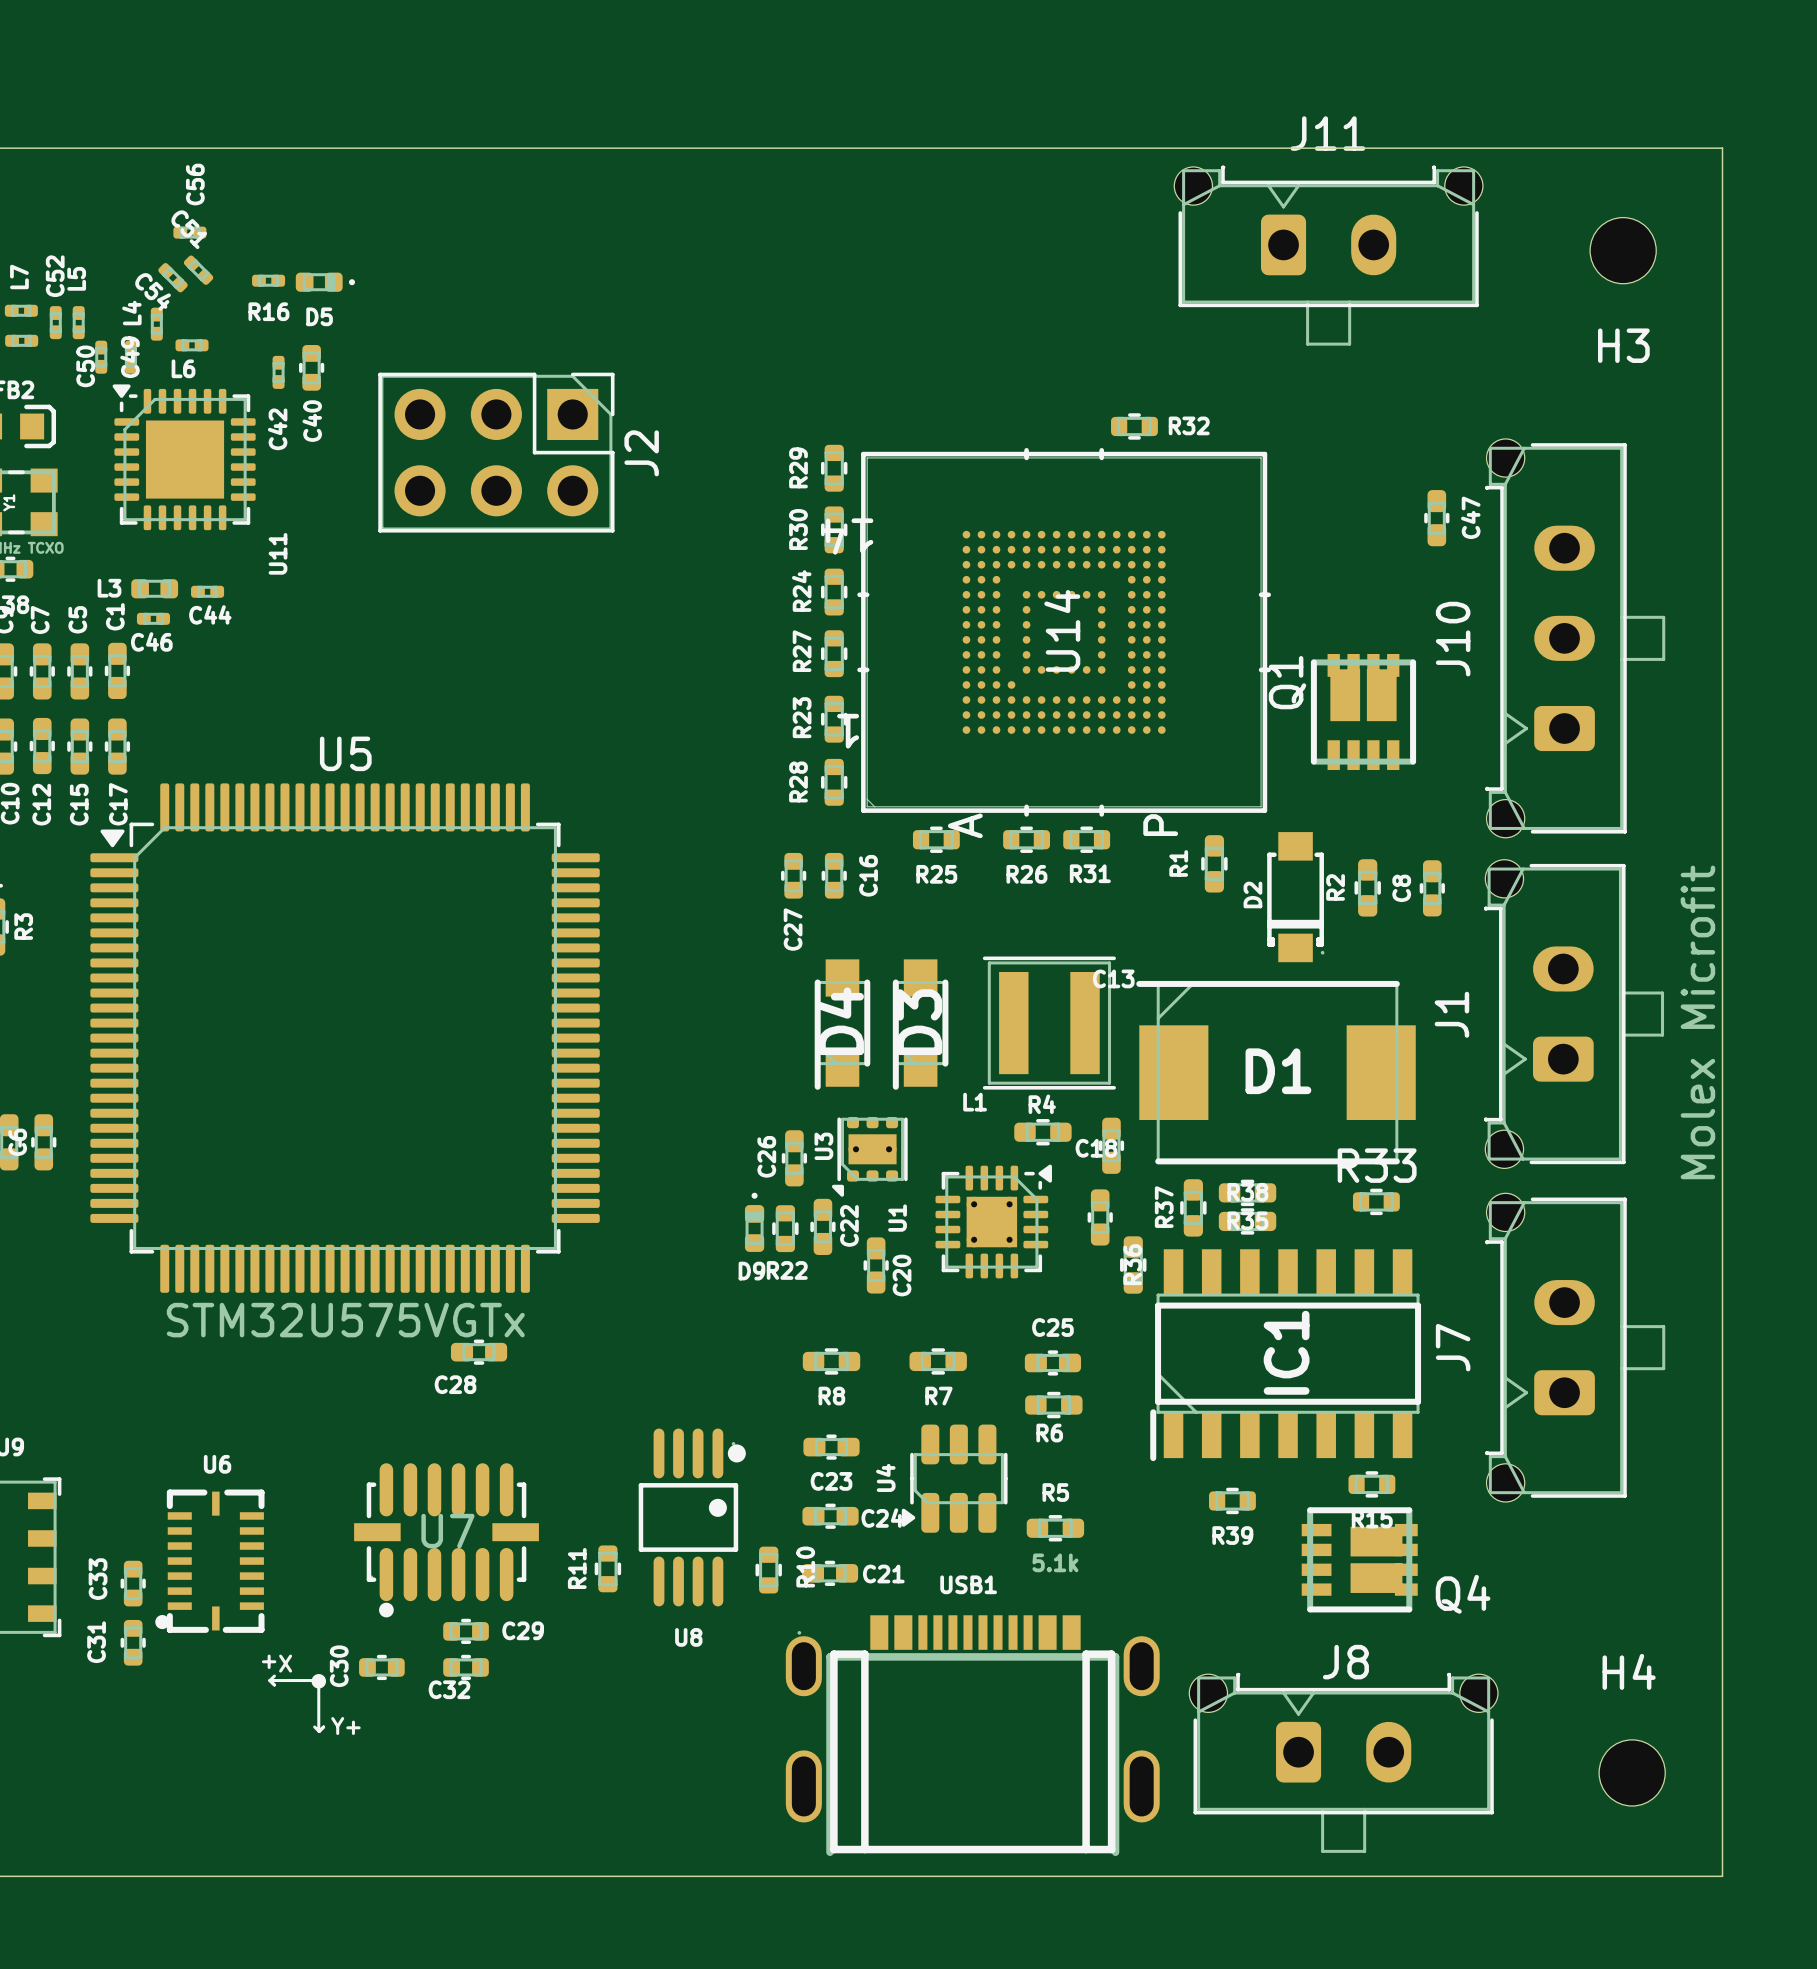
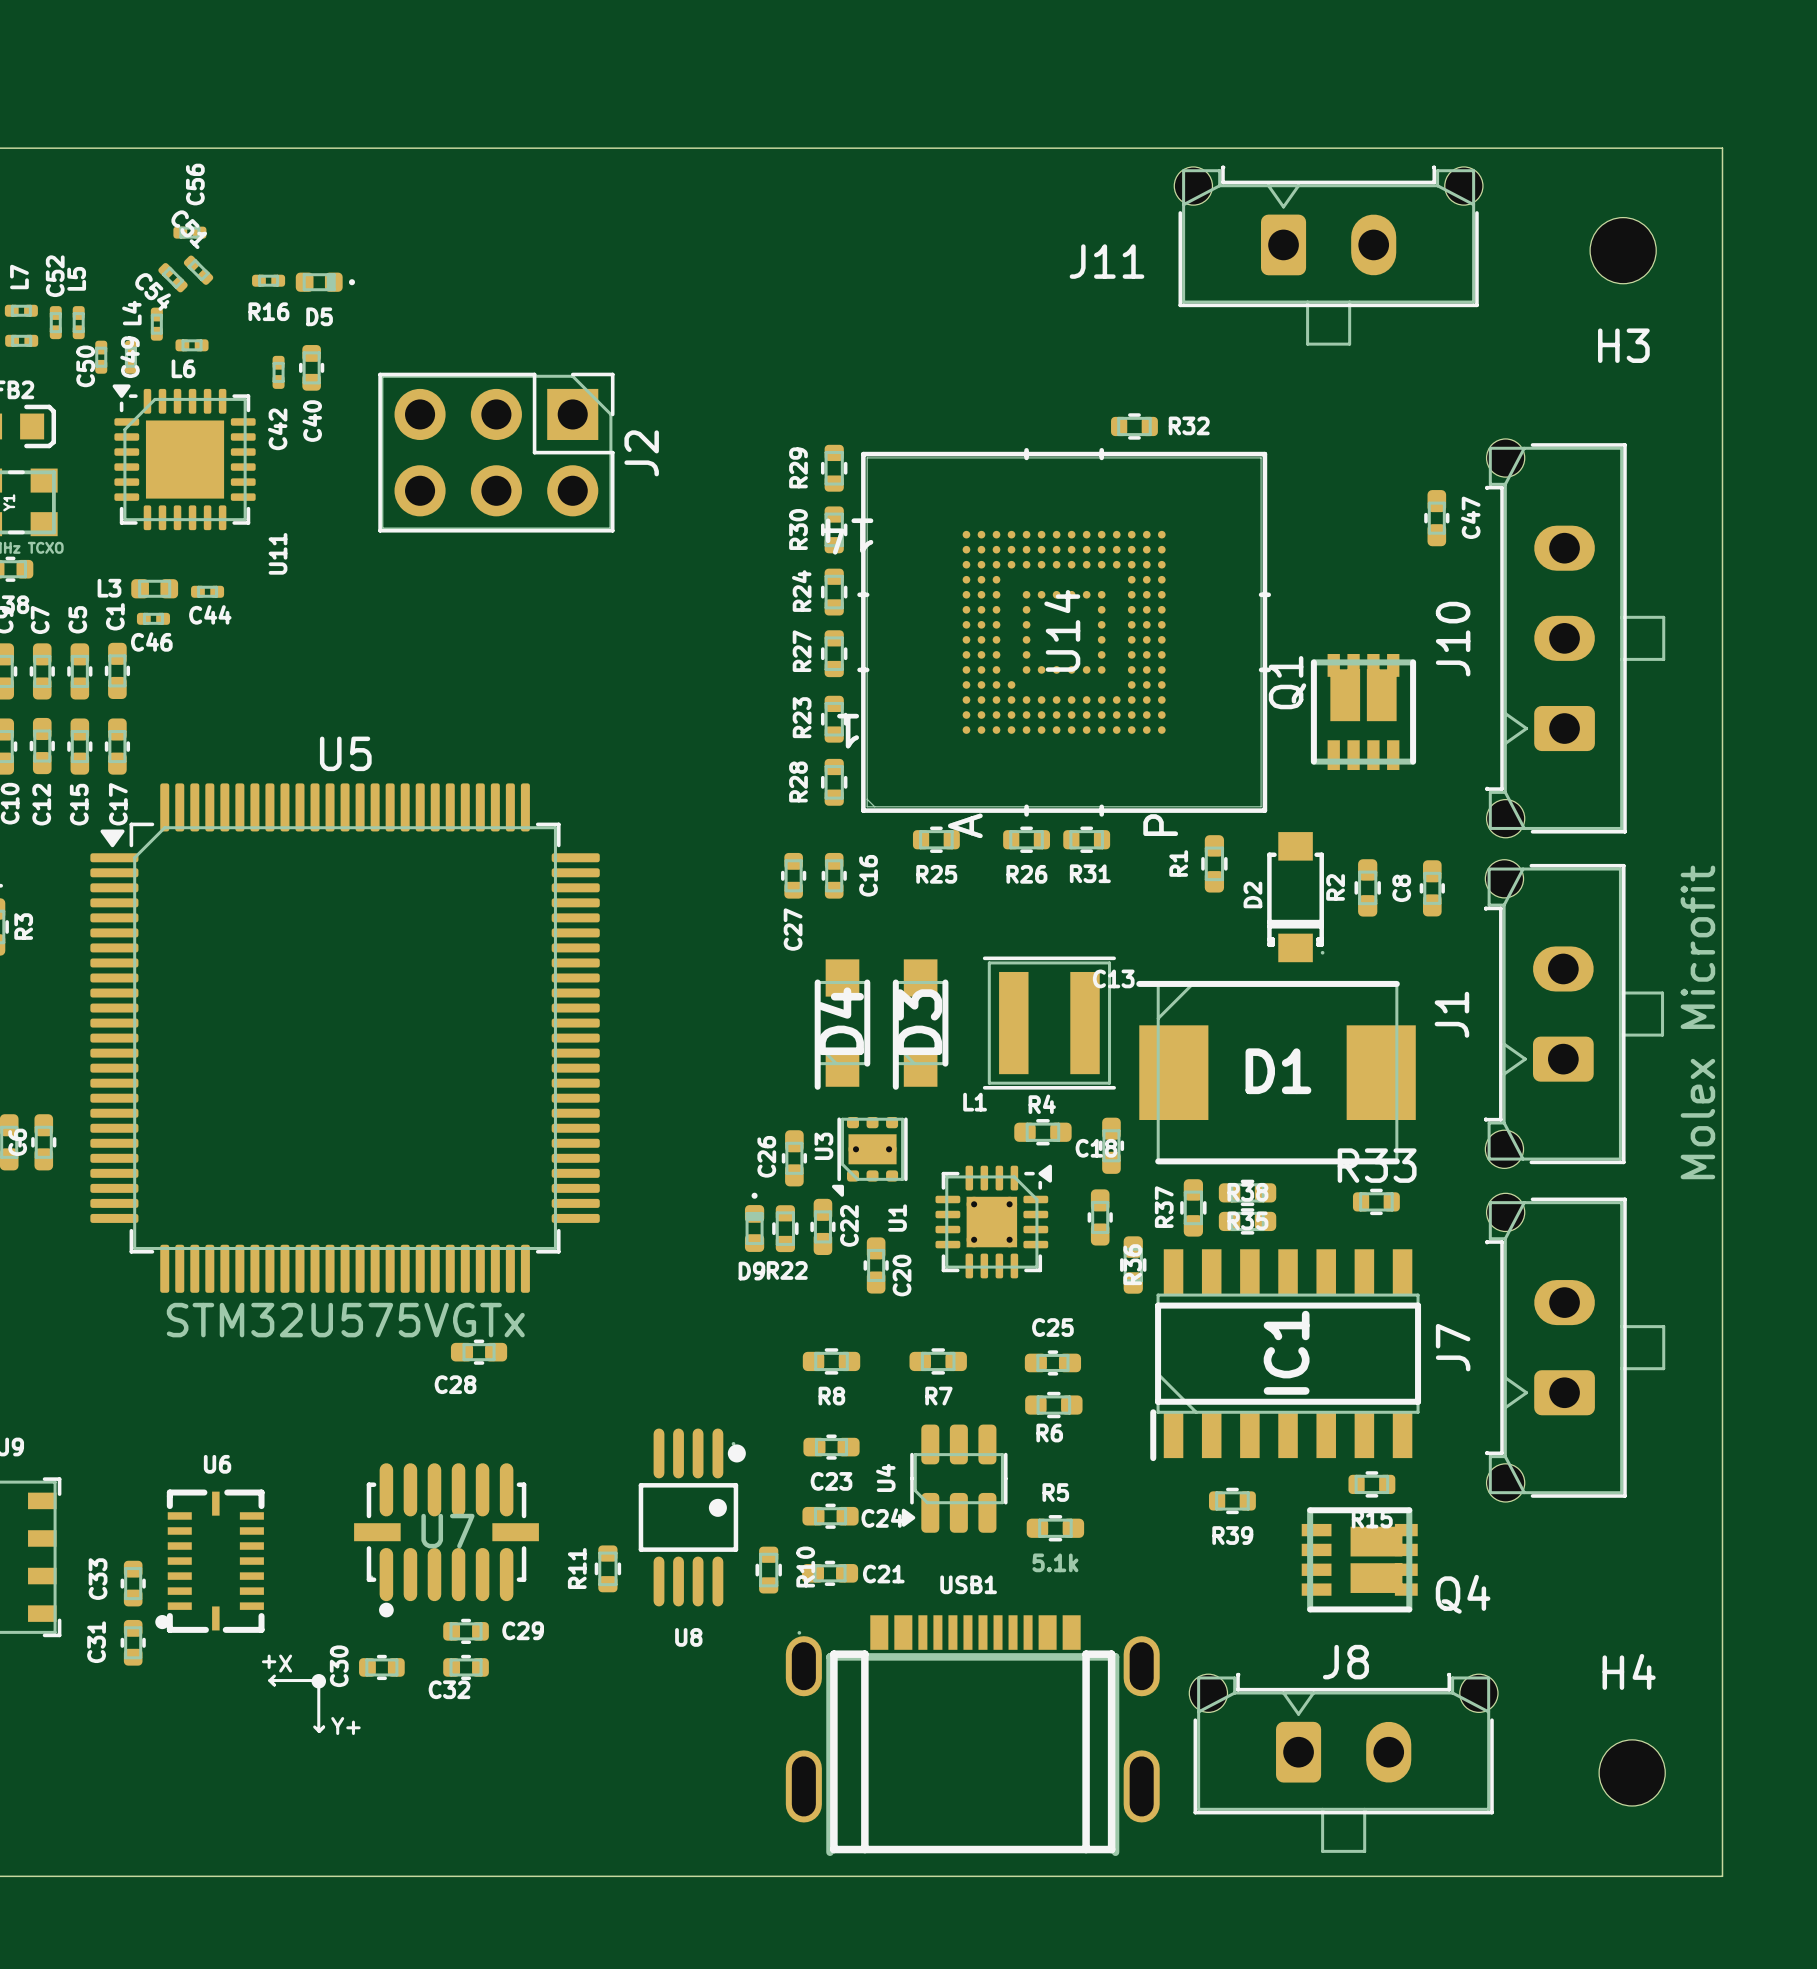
J11 name position: J11 (1327, 133) -> J11 (1107, 261)

